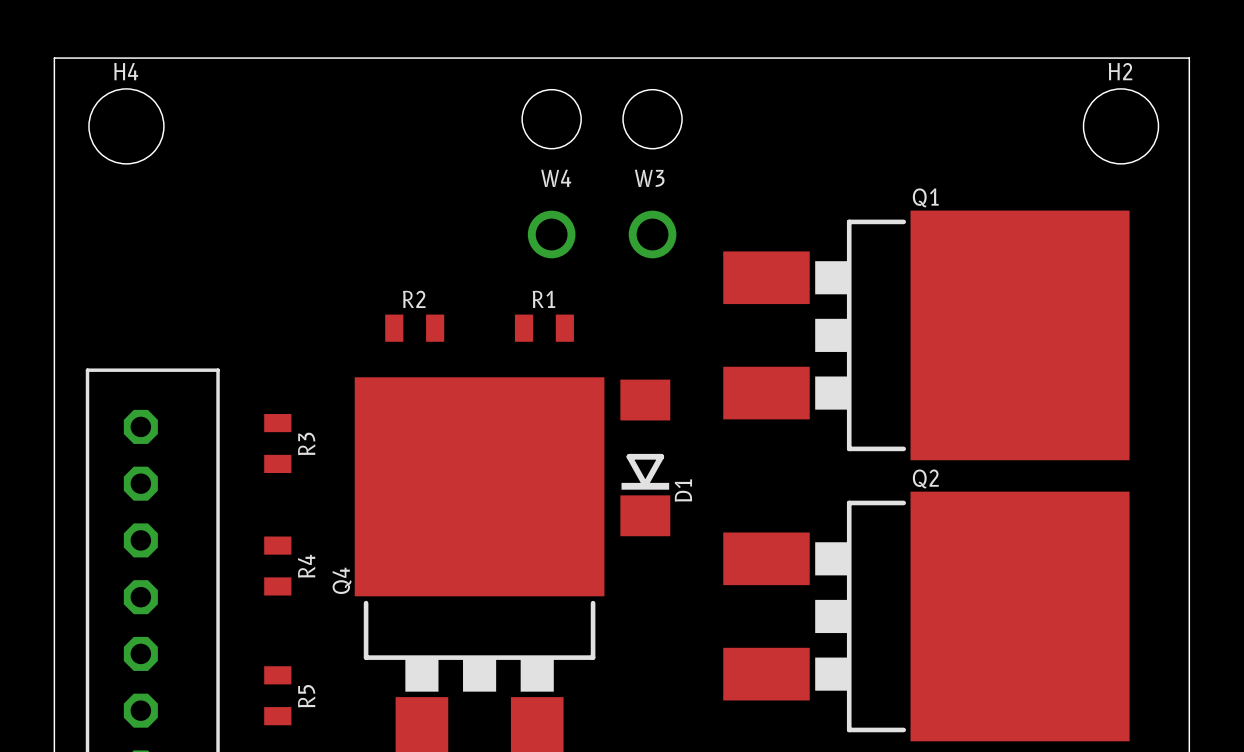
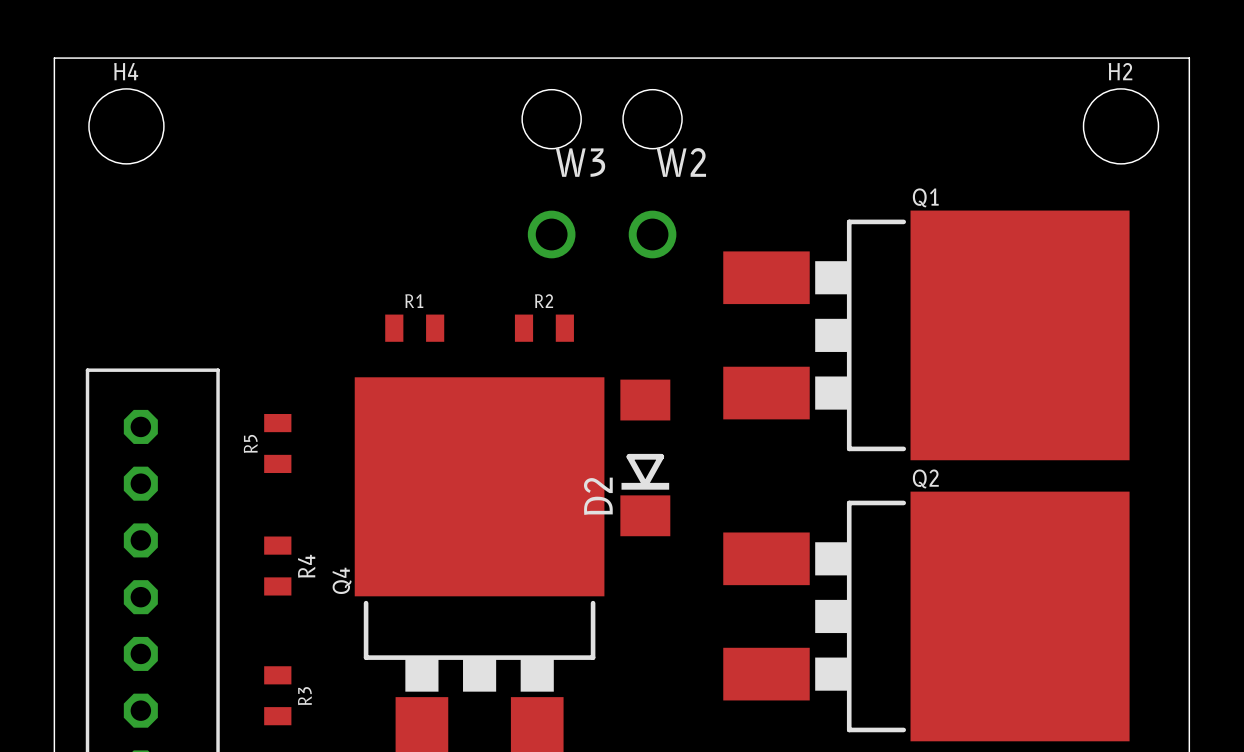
W4 name: W4 (556, 178) -> W3 (580, 162)
W3 name: W3 (649, 178) -> W2 (681, 162)
R2 name: R2 (414, 299) -> R1 (414, 301)
R1 name: R1 (543, 299) -> R2 (544, 301)
R3 name: R3 (306, 443) -> R5 (250, 443)
D1 name: D1 (683, 490) -> D2 (598, 496)
R5 name: R5 (306, 696) -> R3 (304, 696)

